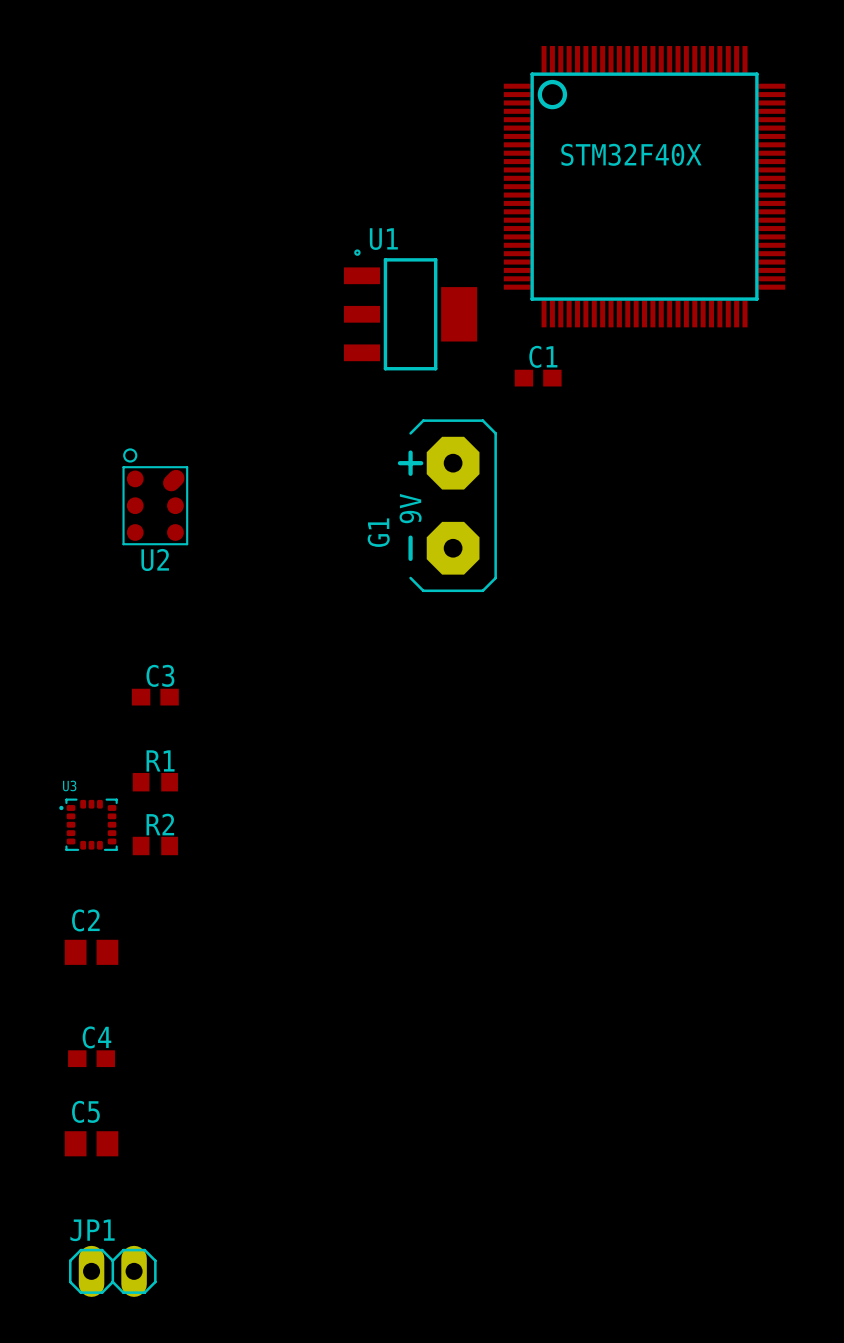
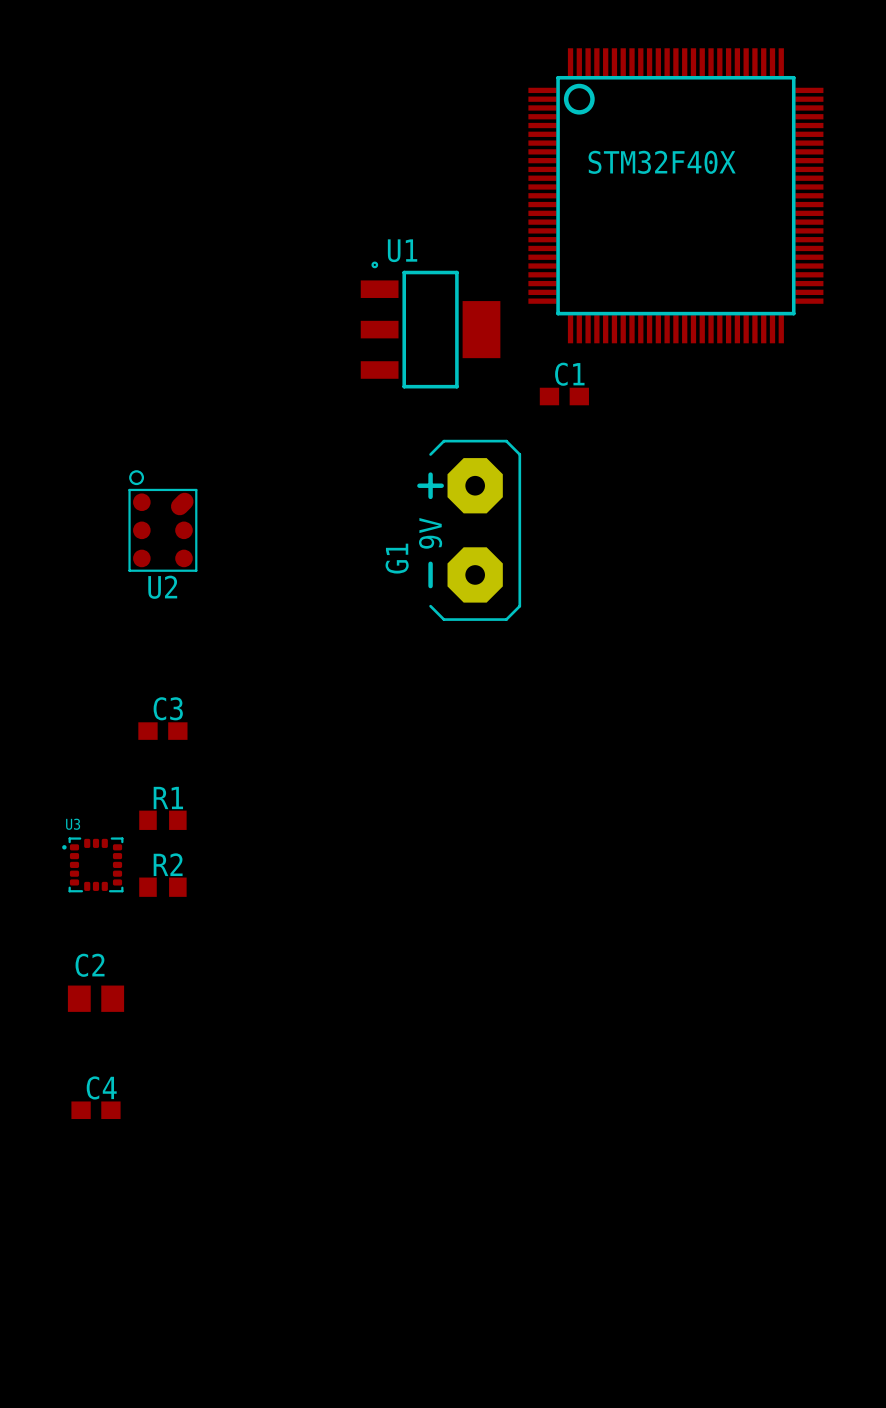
C5: (91, 1143) -> none
JP1: (112, 1271) -> none

